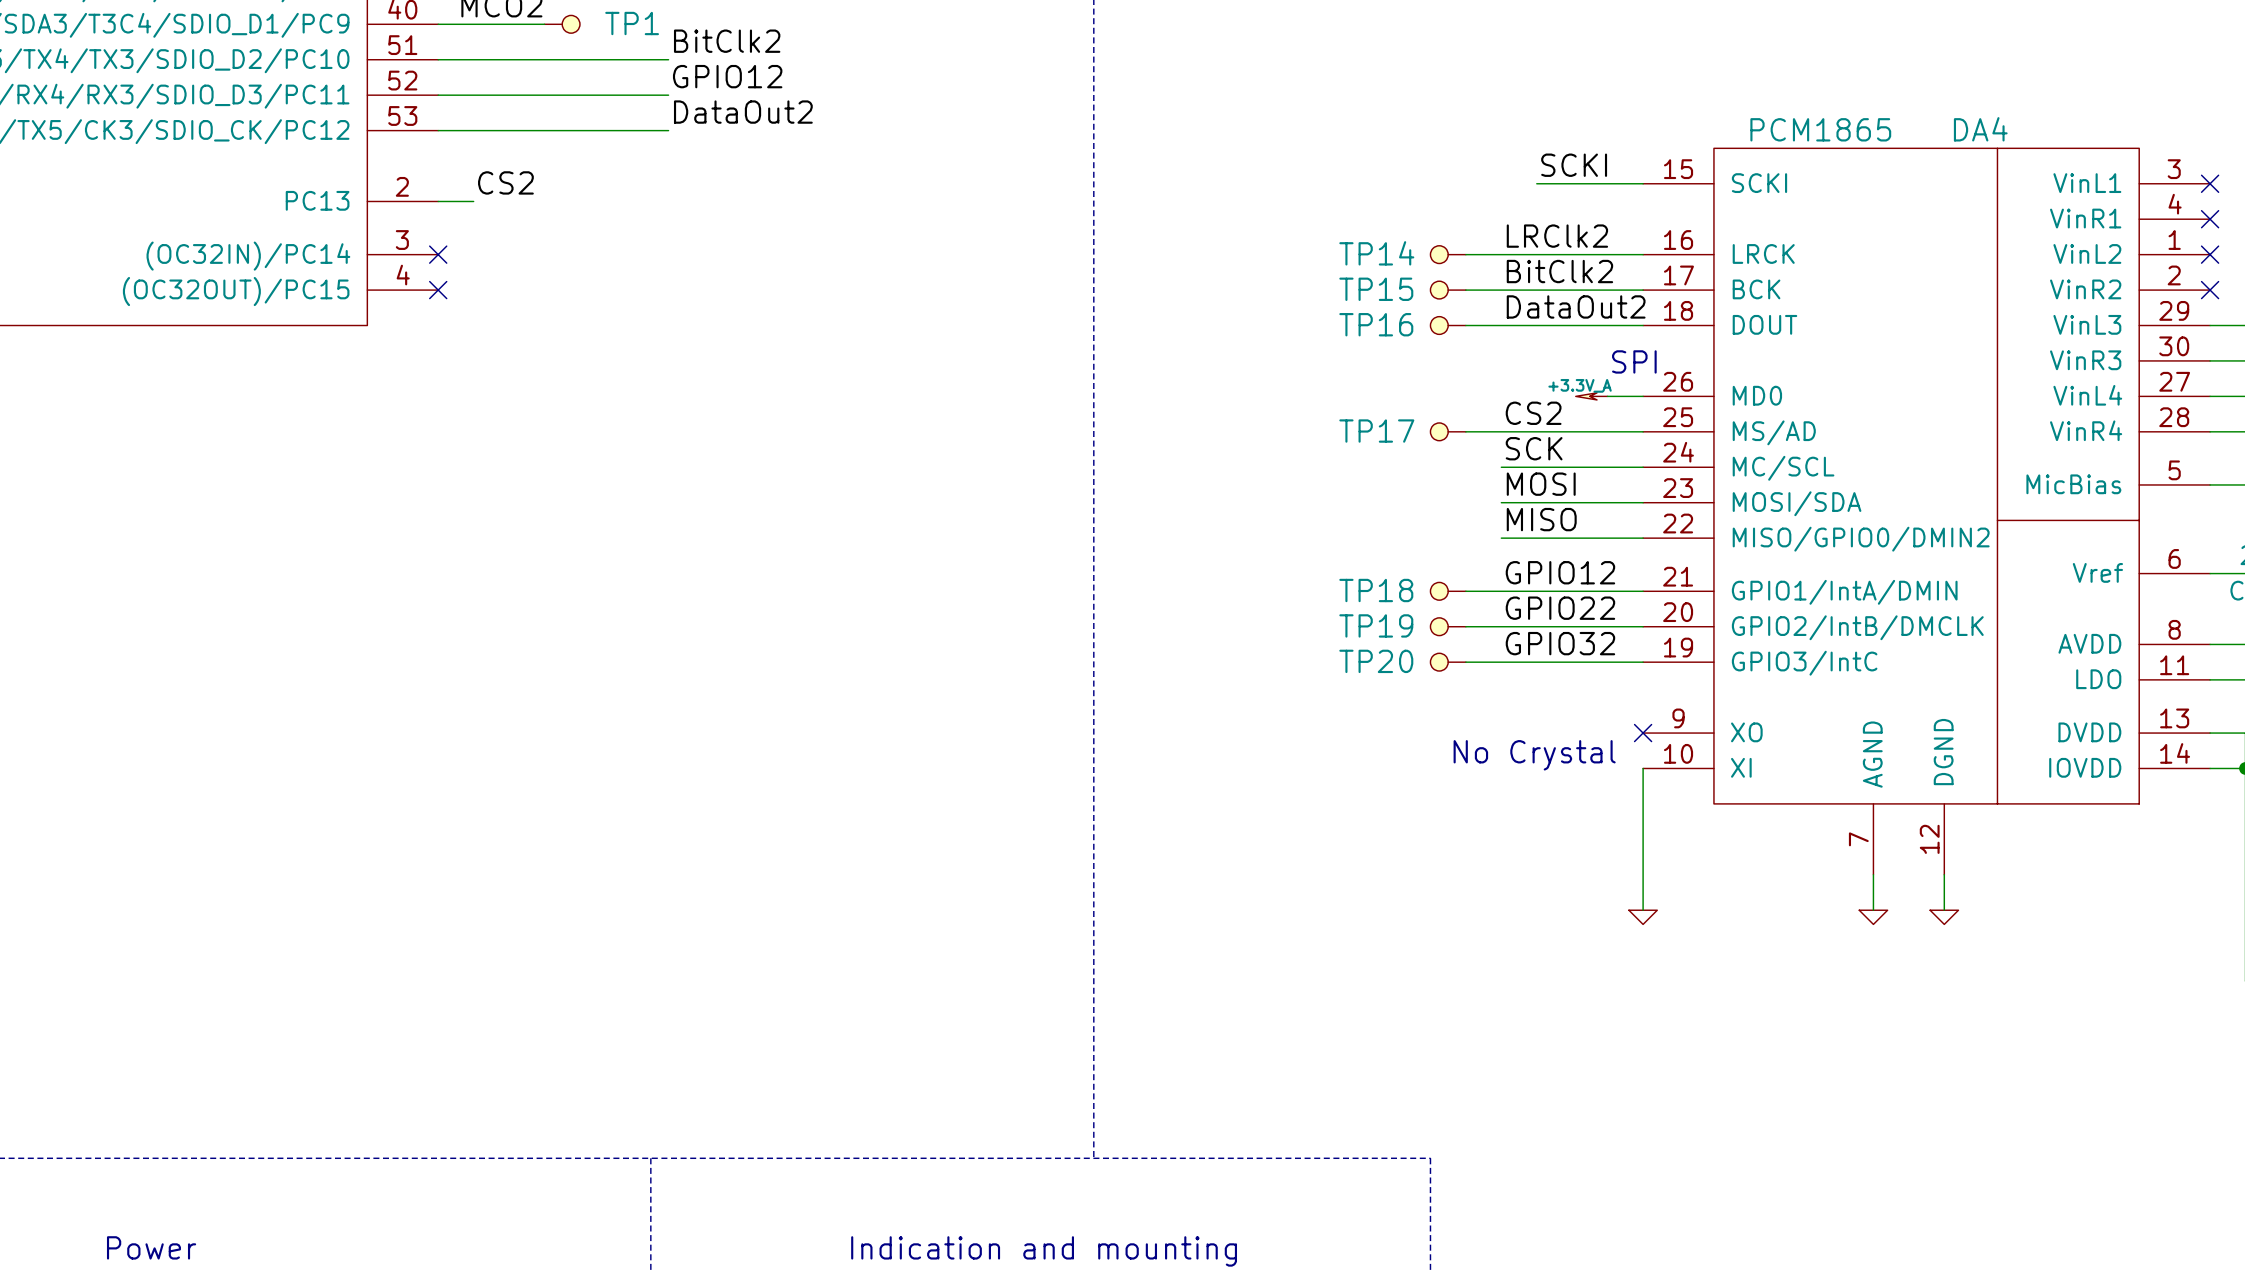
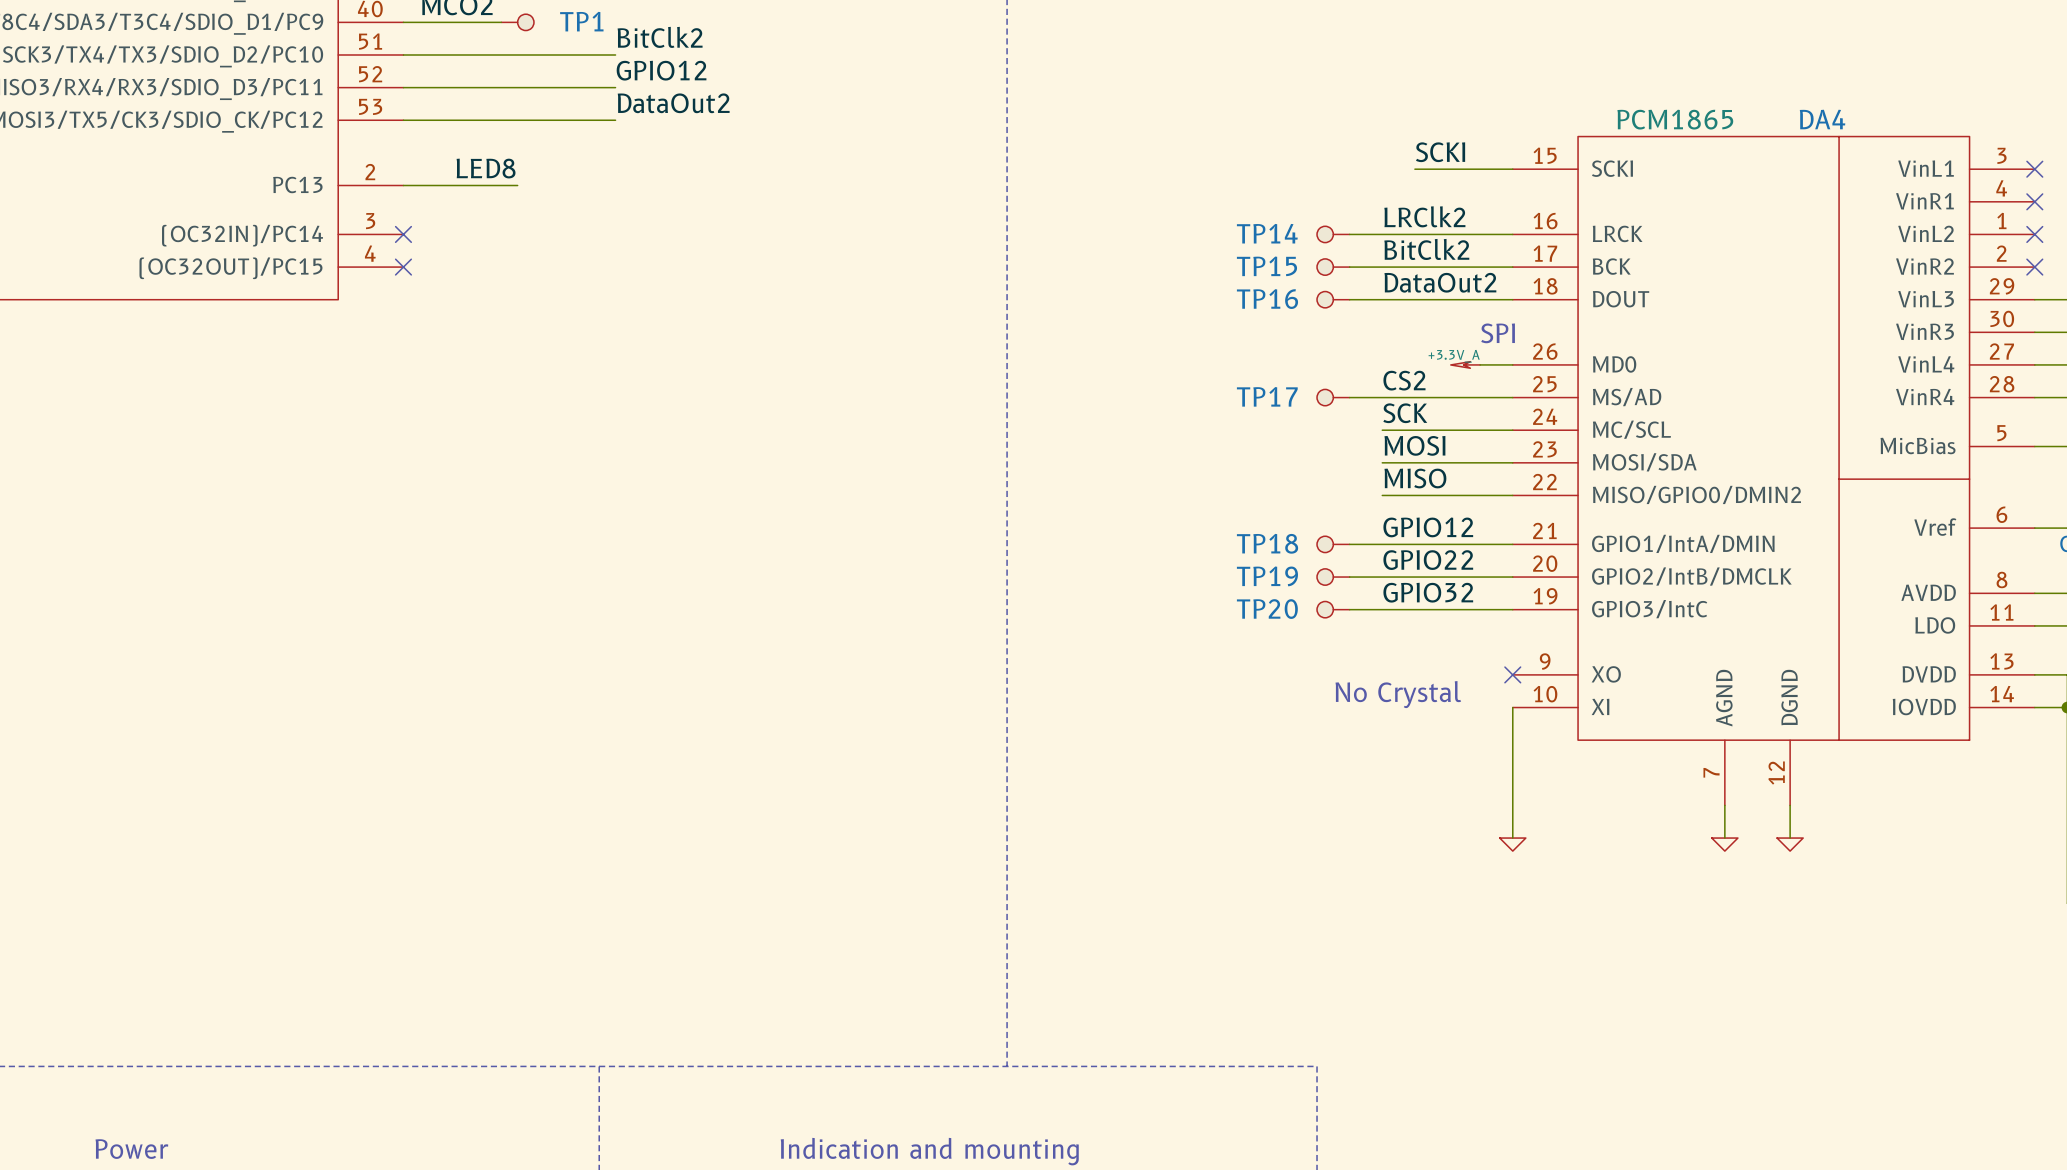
label: CS2 (505, 182) -> none
label: none -> LED8 (486, 168)
wire: none -> (436, 185) (517, 185)

